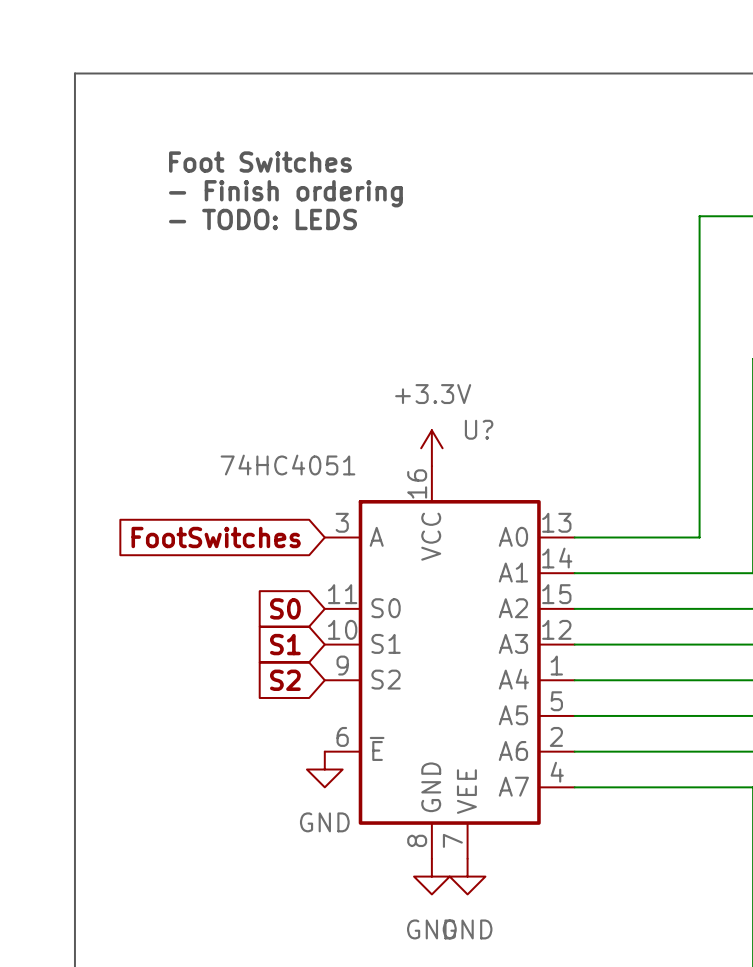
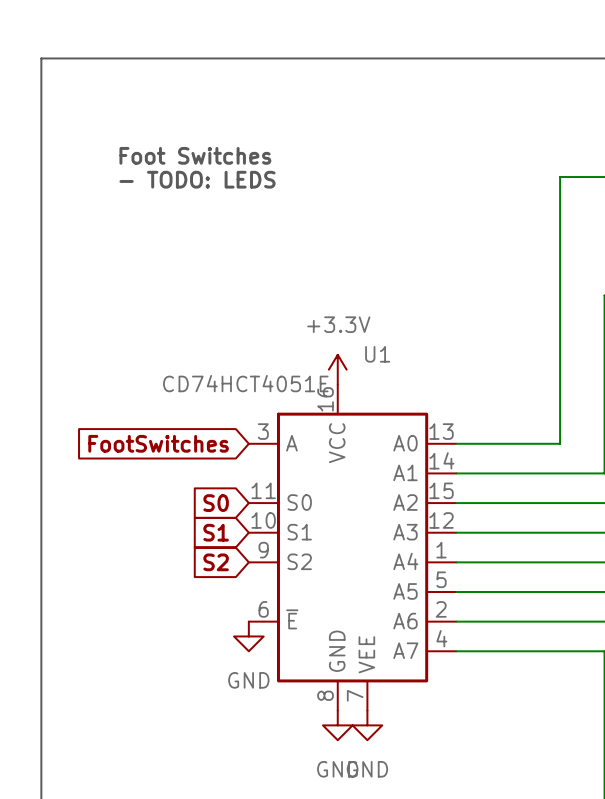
text: Foot Switches (260, 162) -> none
text: - Finish ordering (285, 193) -> Foot Switches (195, 155)
U? name: U? (479, 429) -> U1 (377, 354)
U? value: 74HC4051 (287, 465) -> CD74HCT4051E (245, 383)

